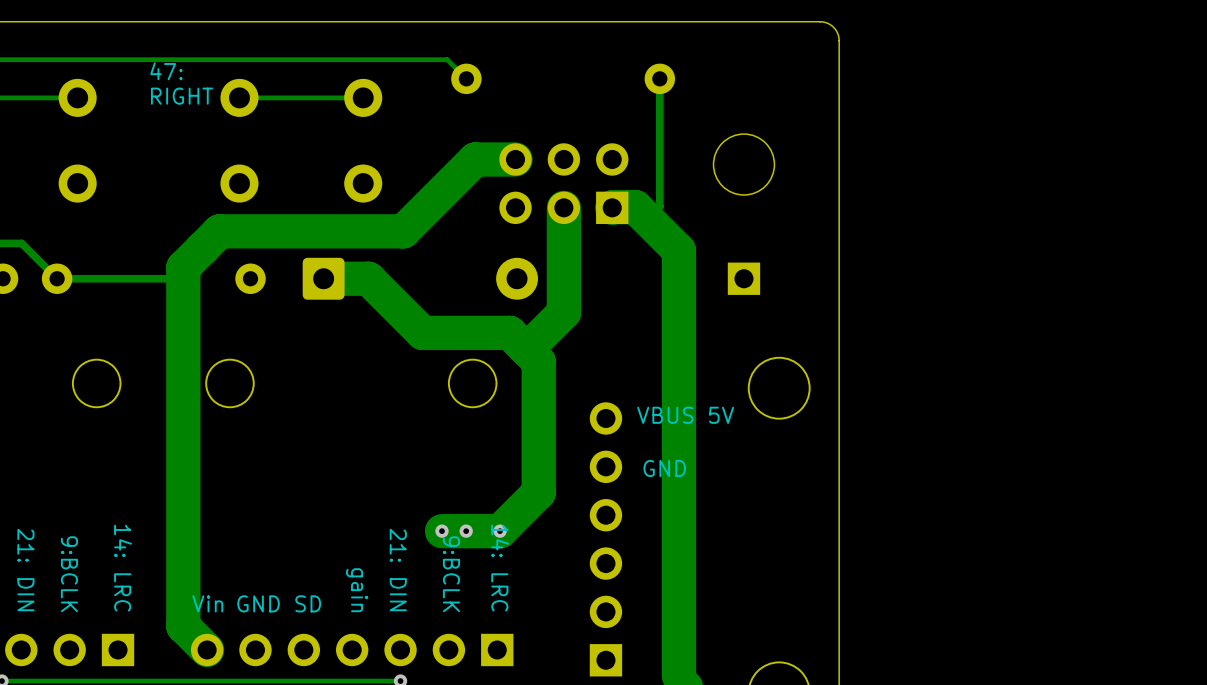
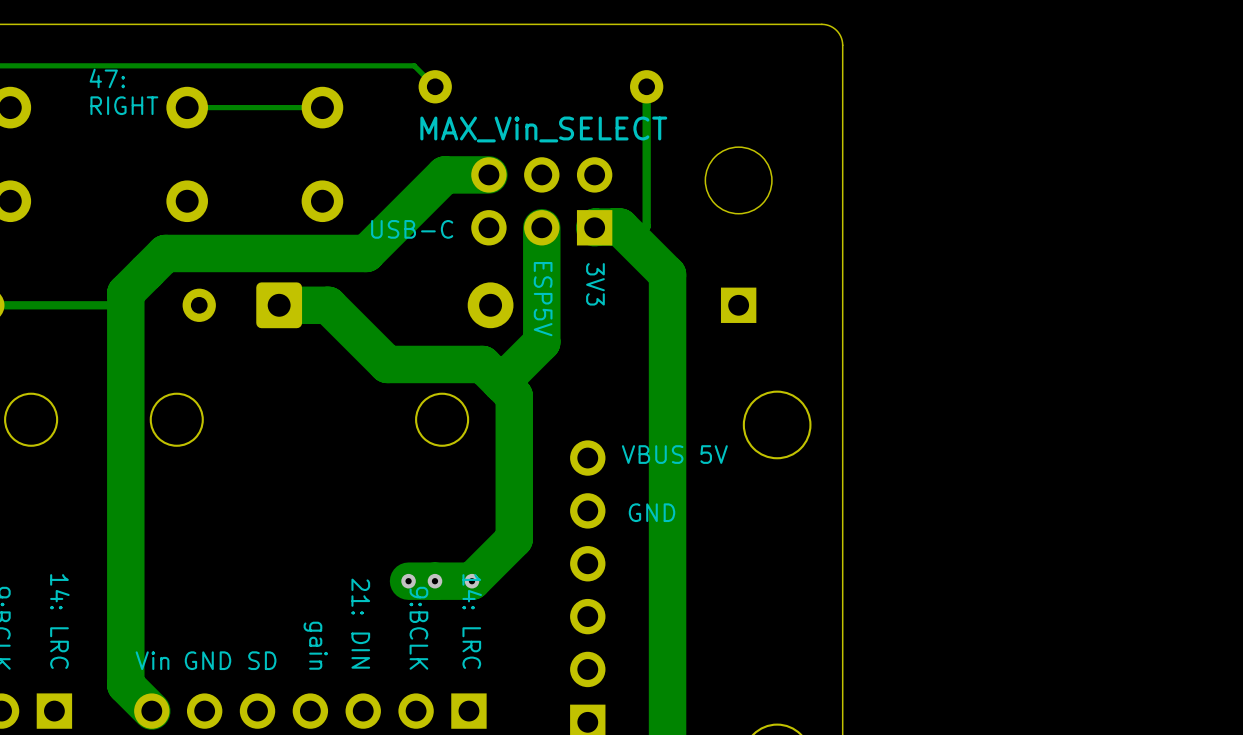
part value: none -> MAX_Vin_SELECT (543, 129)
text: none -> USB-C (412, 229)
text: none -> 3V3 (595, 284)
text: none -> ESP5V (543, 299)

